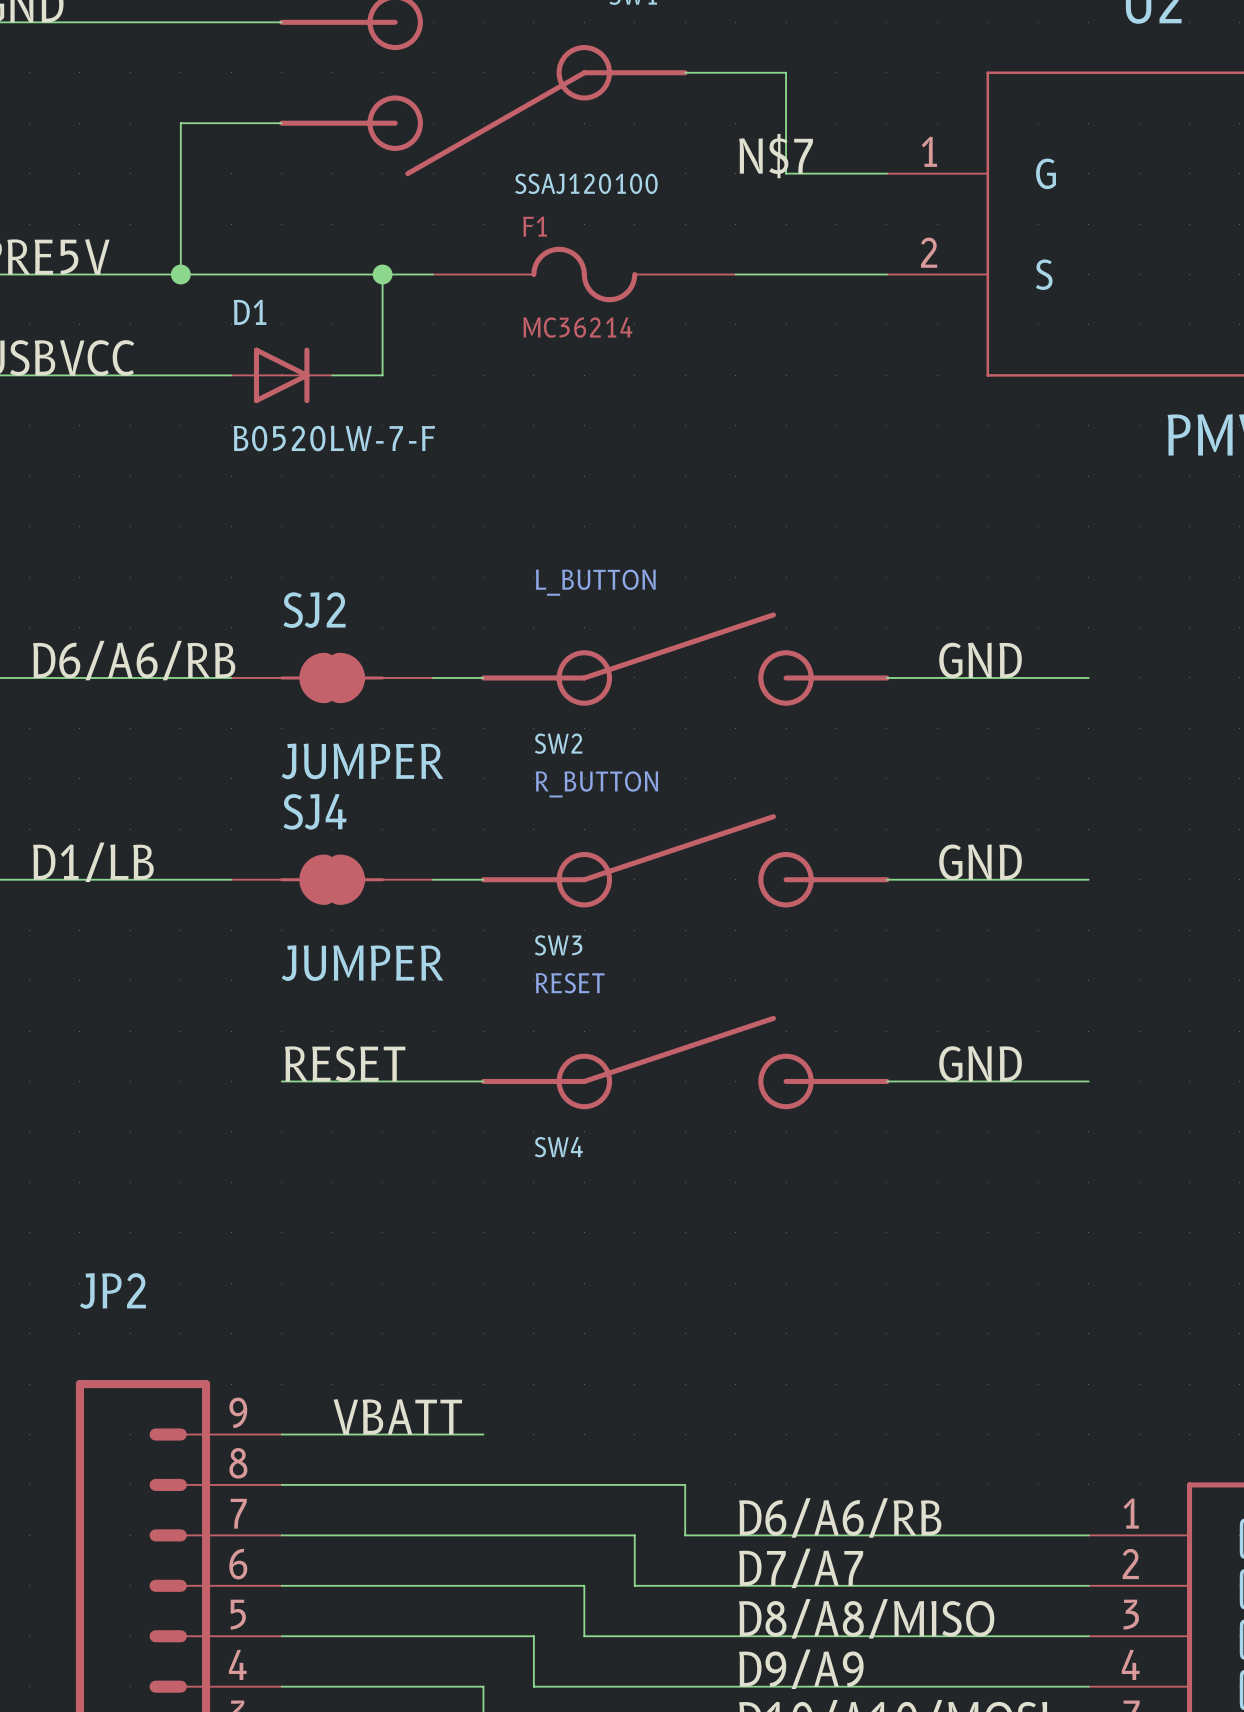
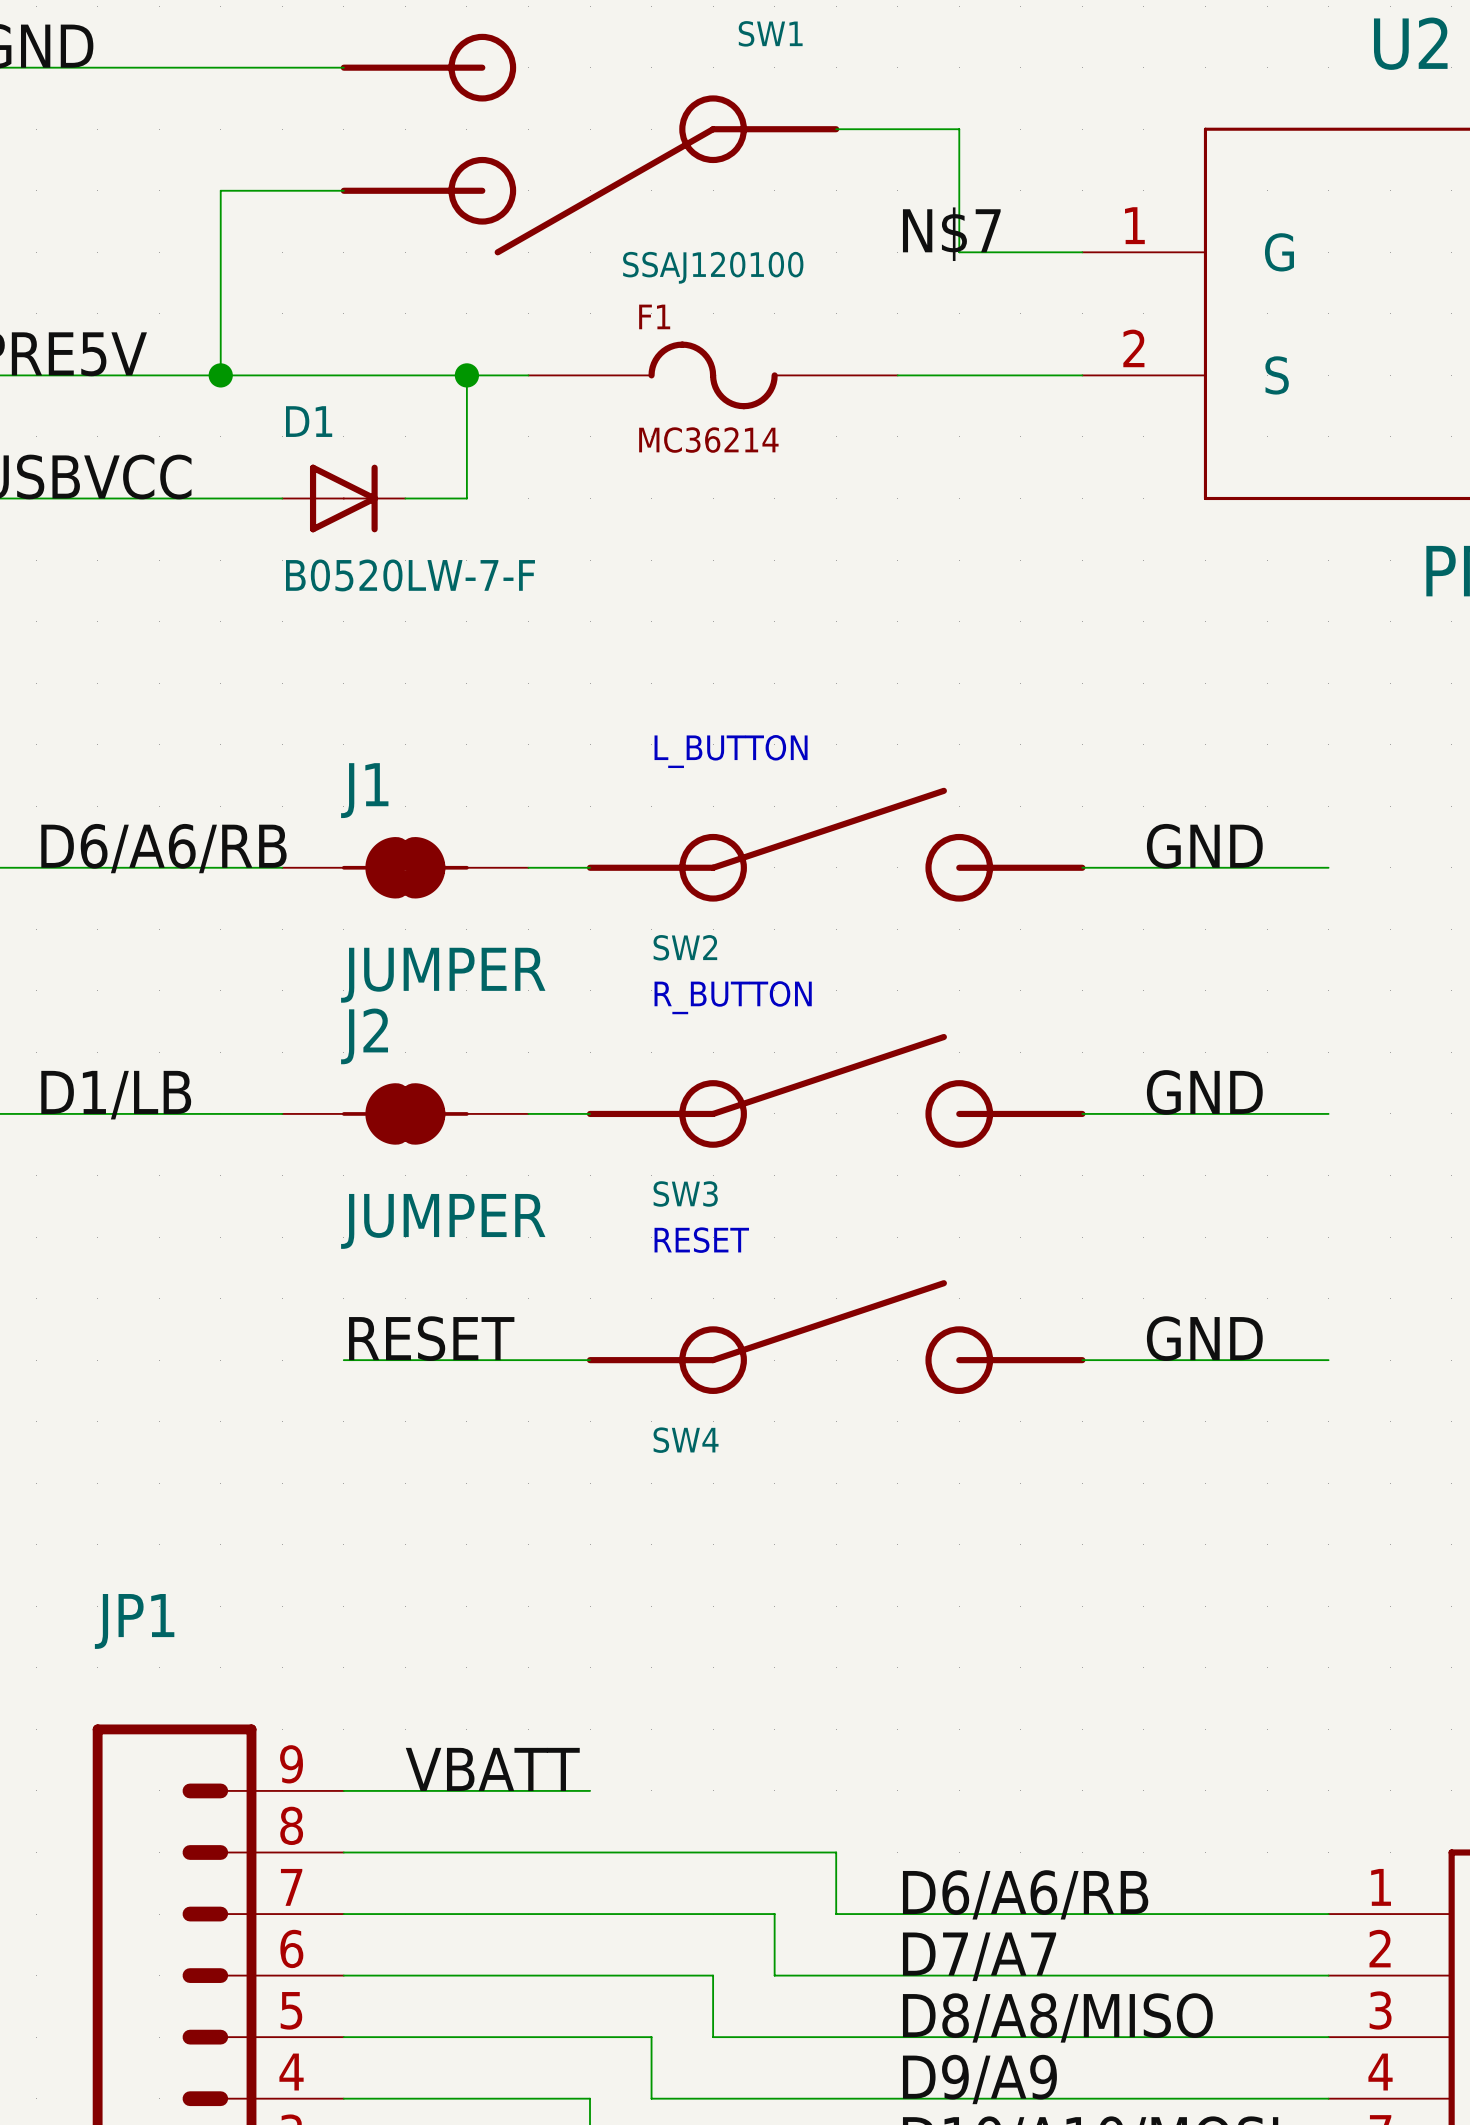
SJ2 name: SJ2 (314, 610) -> J1 (364, 790)
SJ4 name: SJ4 (314, 811) -> J2 (364, 1036)
JP2 name: JP2 (112, 1290) -> JP1 (134, 1621)

